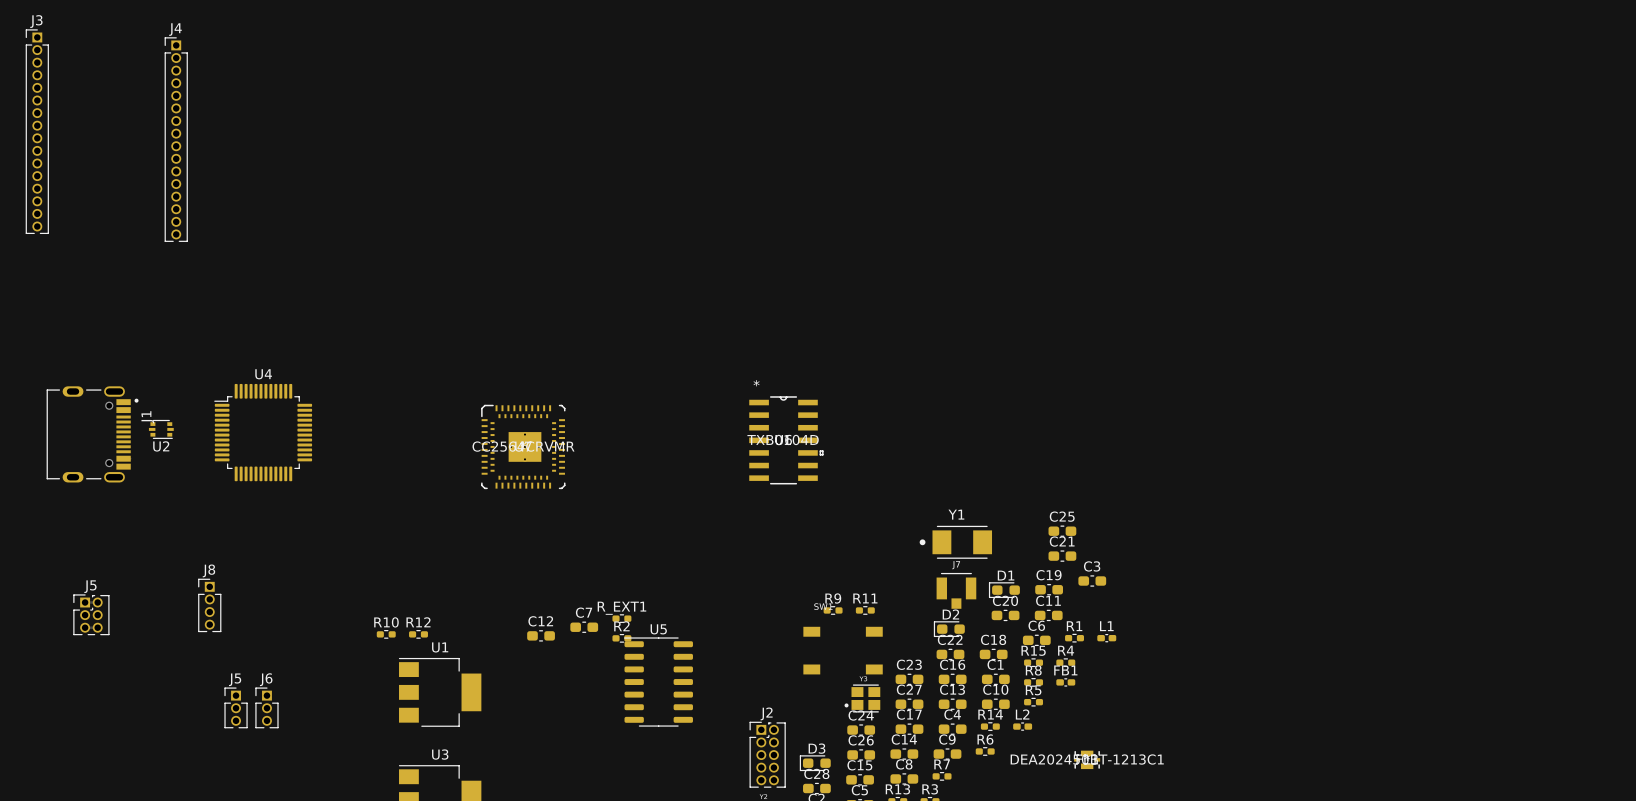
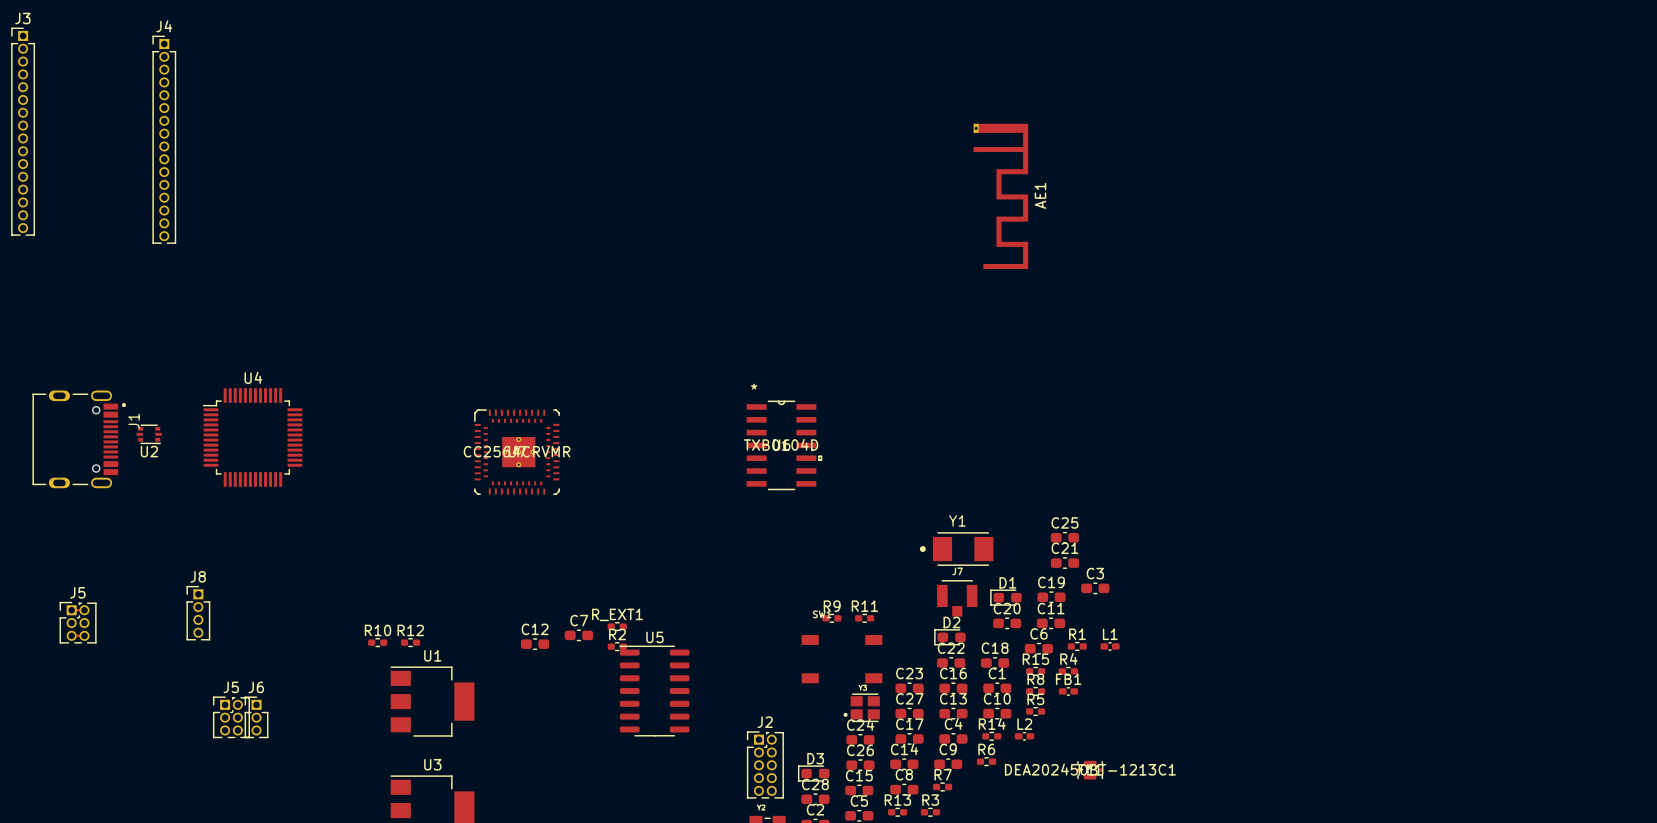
AE1: none -> (1000, 196)
J5 footprint: [224, 687, 248, 729] -> [213, 696, 250, 739]

